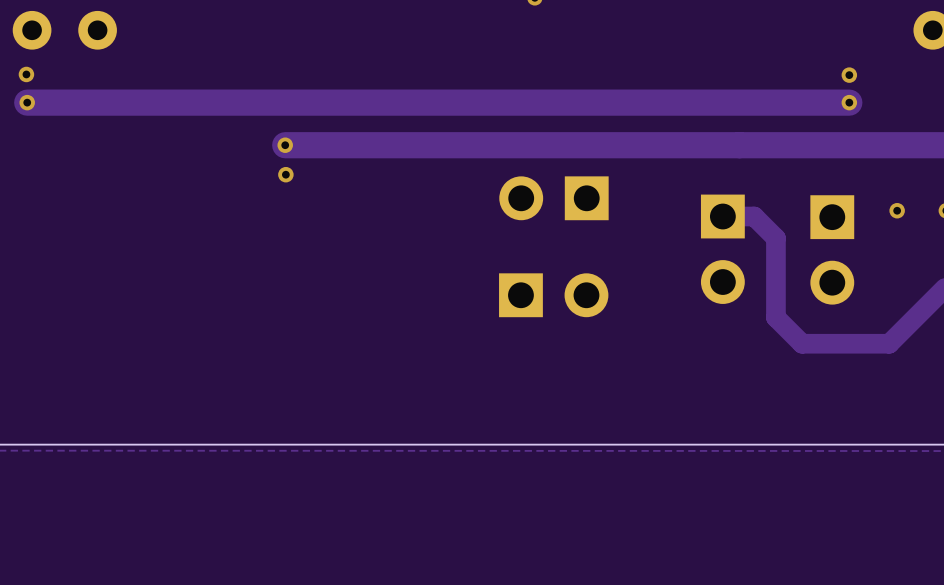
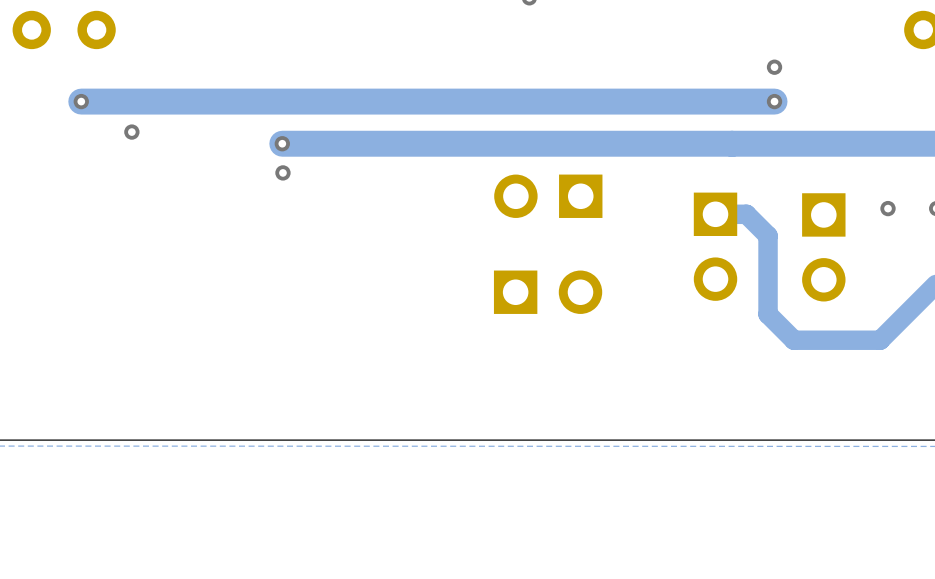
via: none -> (774, 67)
via: (26, 74) -> none
via: (849, 75) -> none
via: (27, 102) -> none
track: (82, 102) (27, 102) -> none
via: none -> (81, 101)
via: none -> (774, 101)
track: (849, 102) (782, 102) -> none
via: (849, 102) -> none
via: none -> (131, 132)

